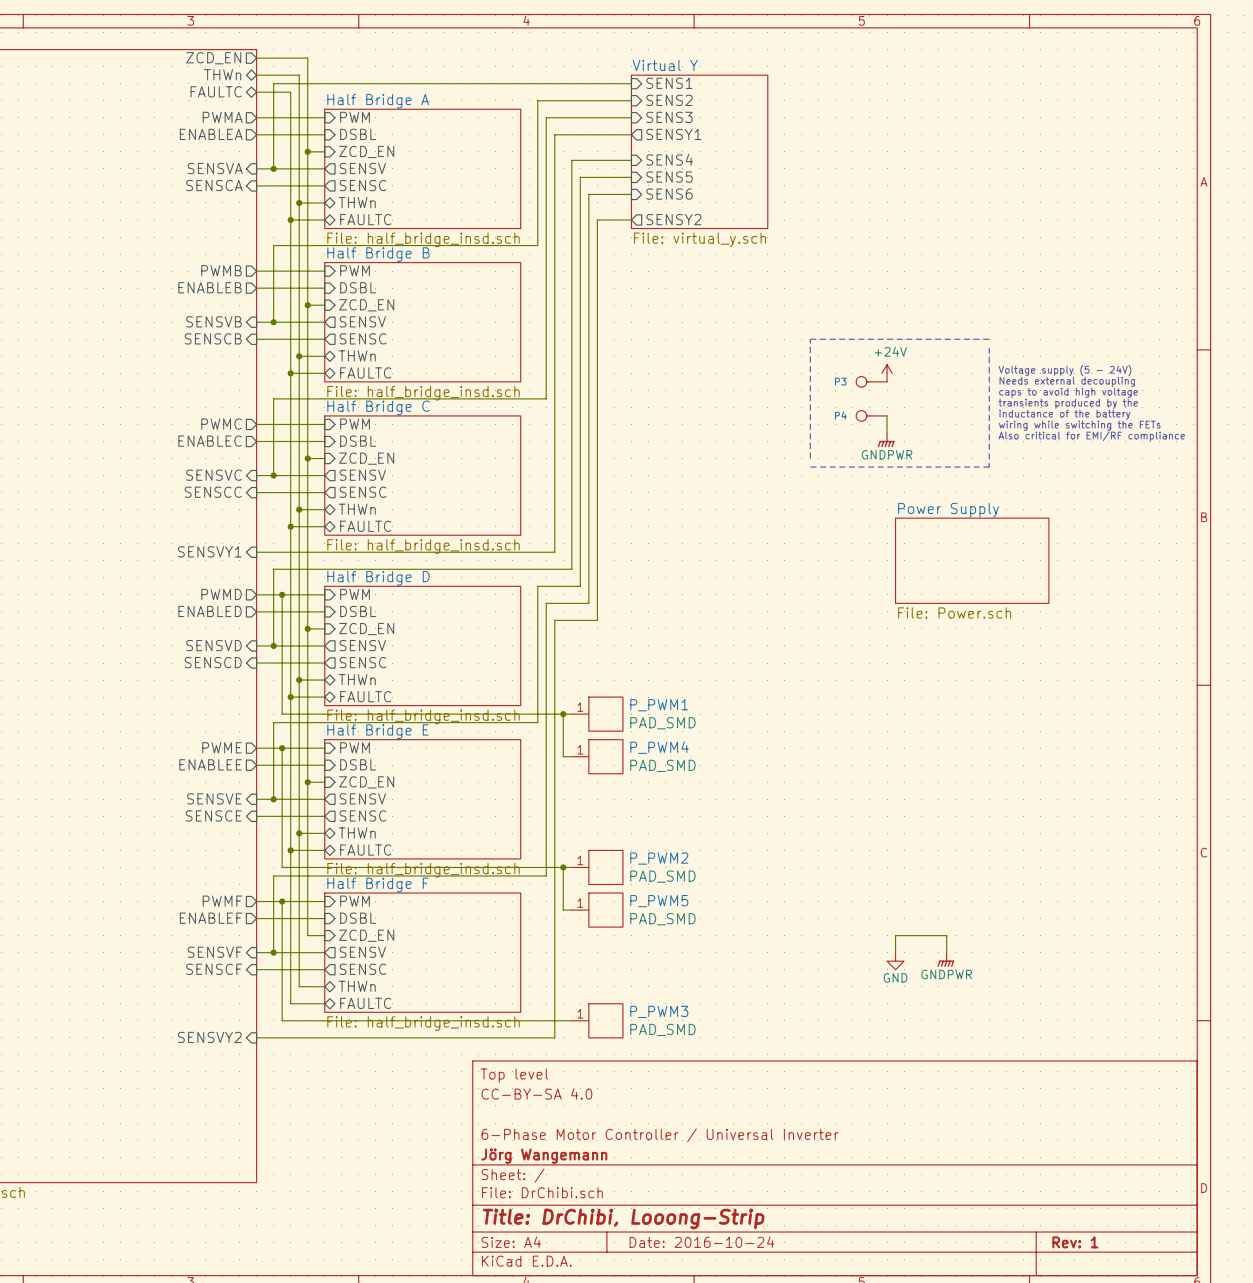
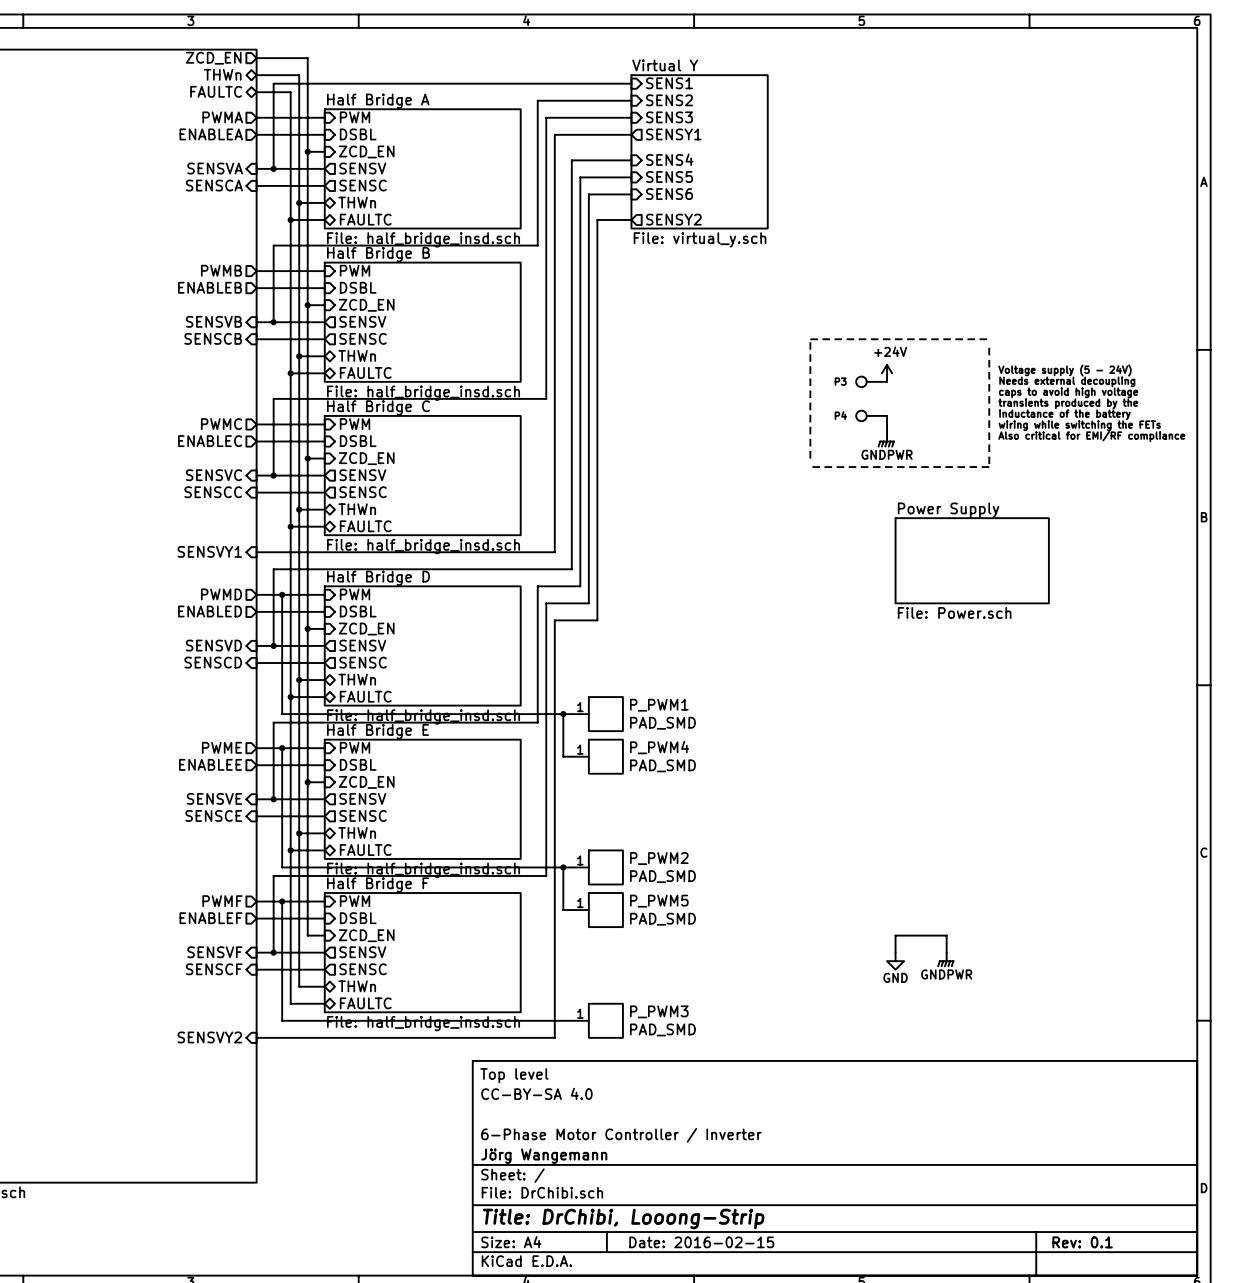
title block: 6-Phase Motor Controller / Universal Inverter (660, 1135) -> 6-Phase Motor Controller / Inverter (621, 1135)
title block: Date: 2016-10-24 (701, 1242) -> Date: 2016-02-15 (701, 1242)
title block: Rev: 1 (1075, 1242) -> Rev: 0.1 (1082, 1242)

